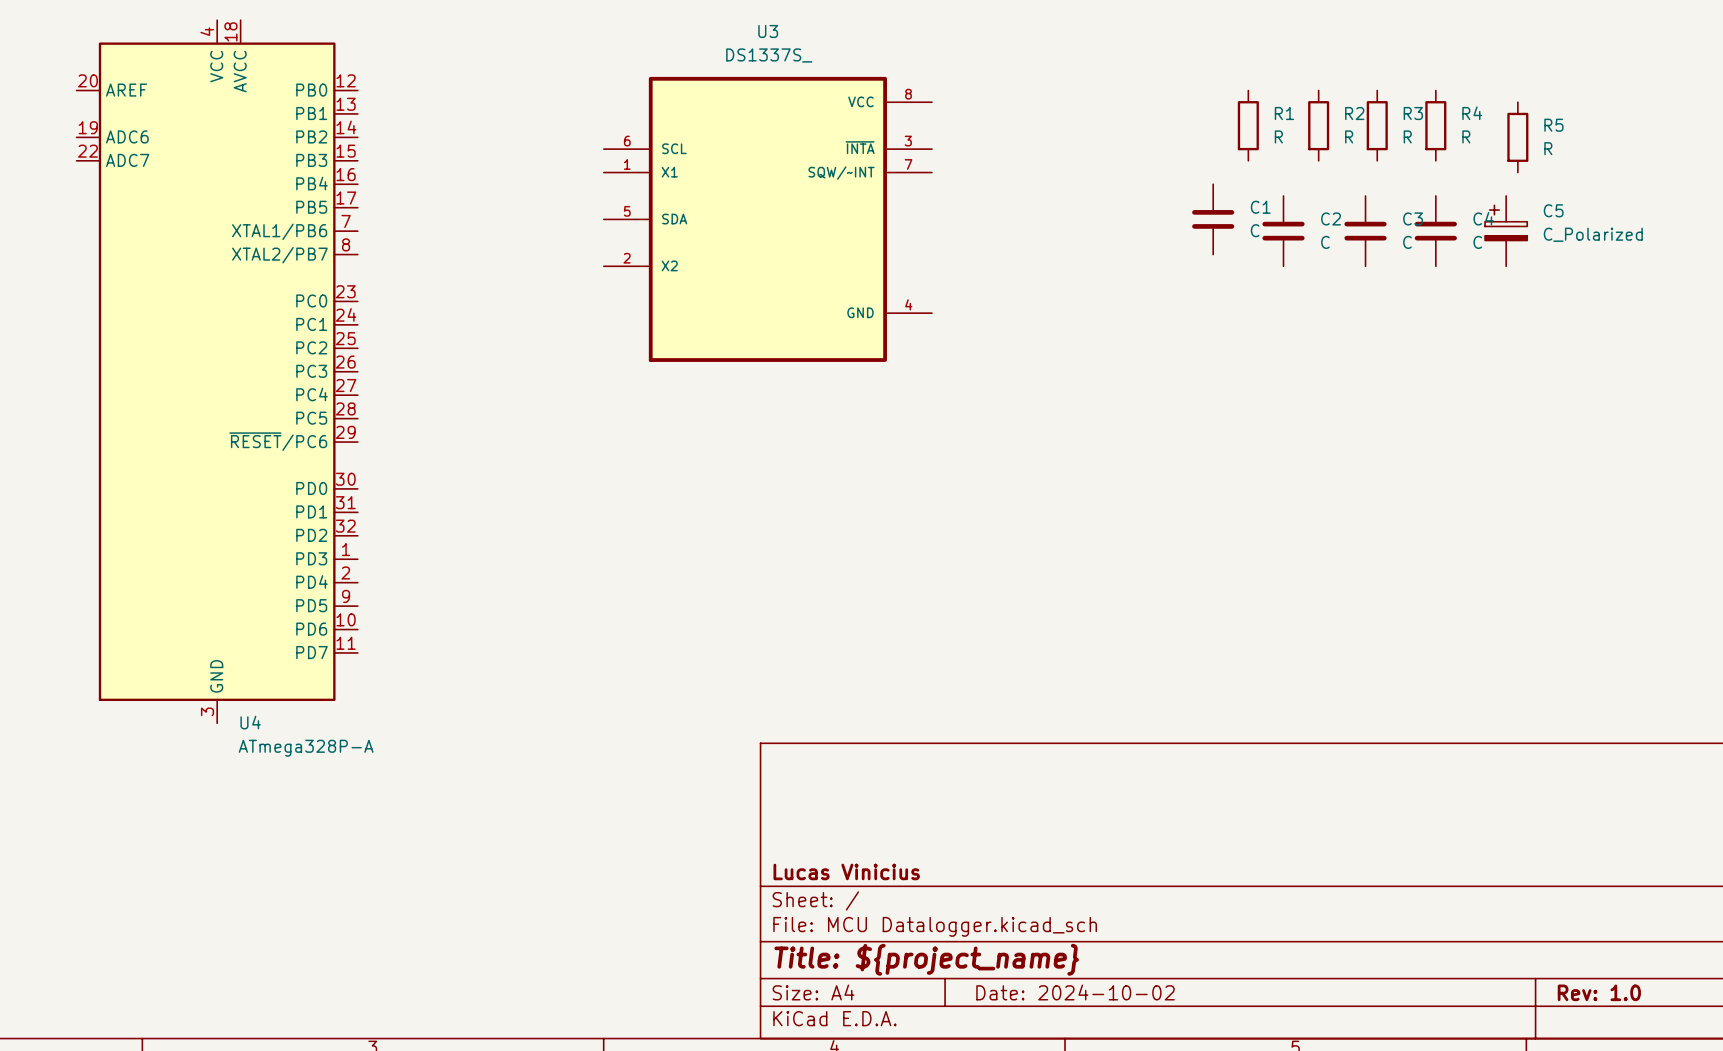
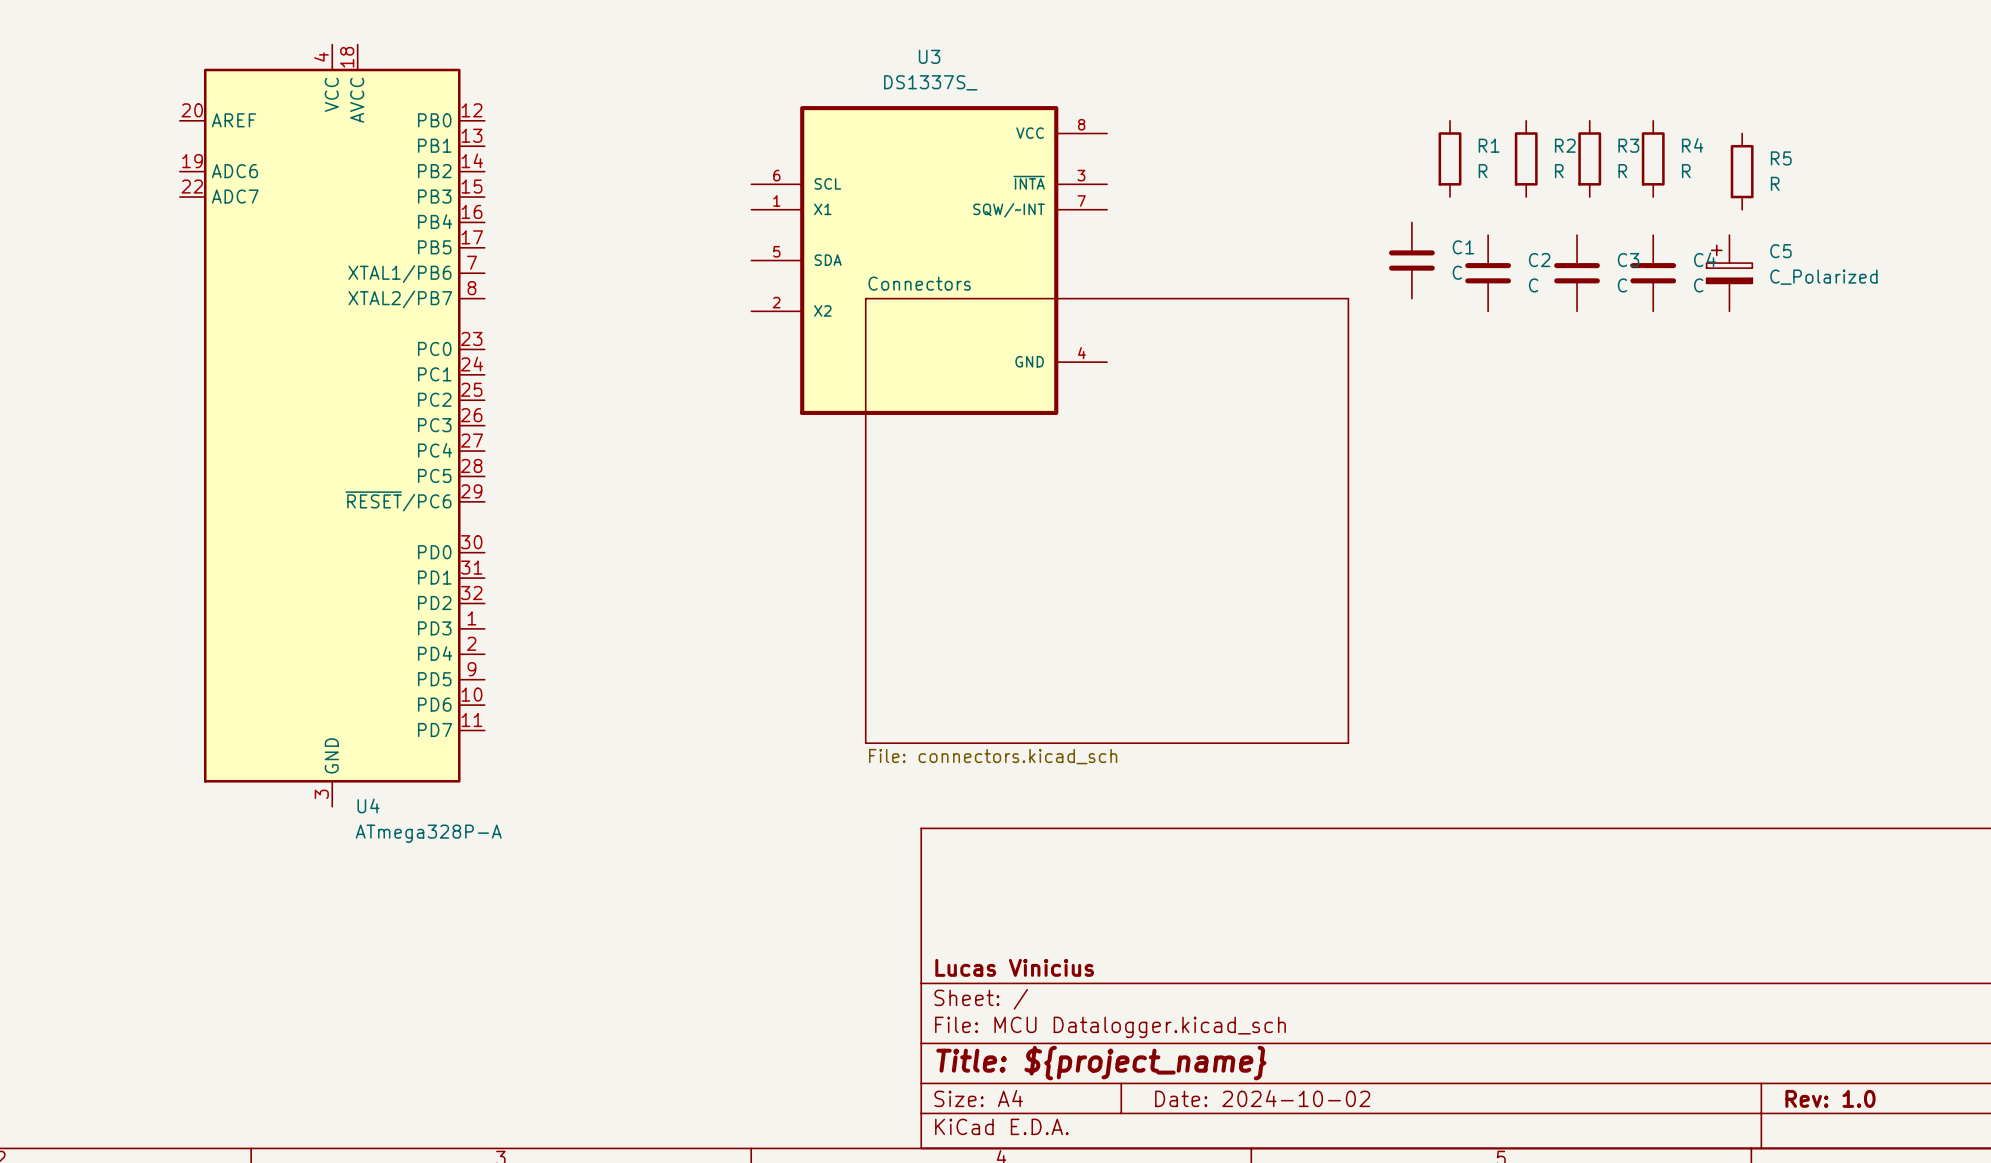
sheet Connectors: none -> File: connectors.kicad_sch (1107, 520)

